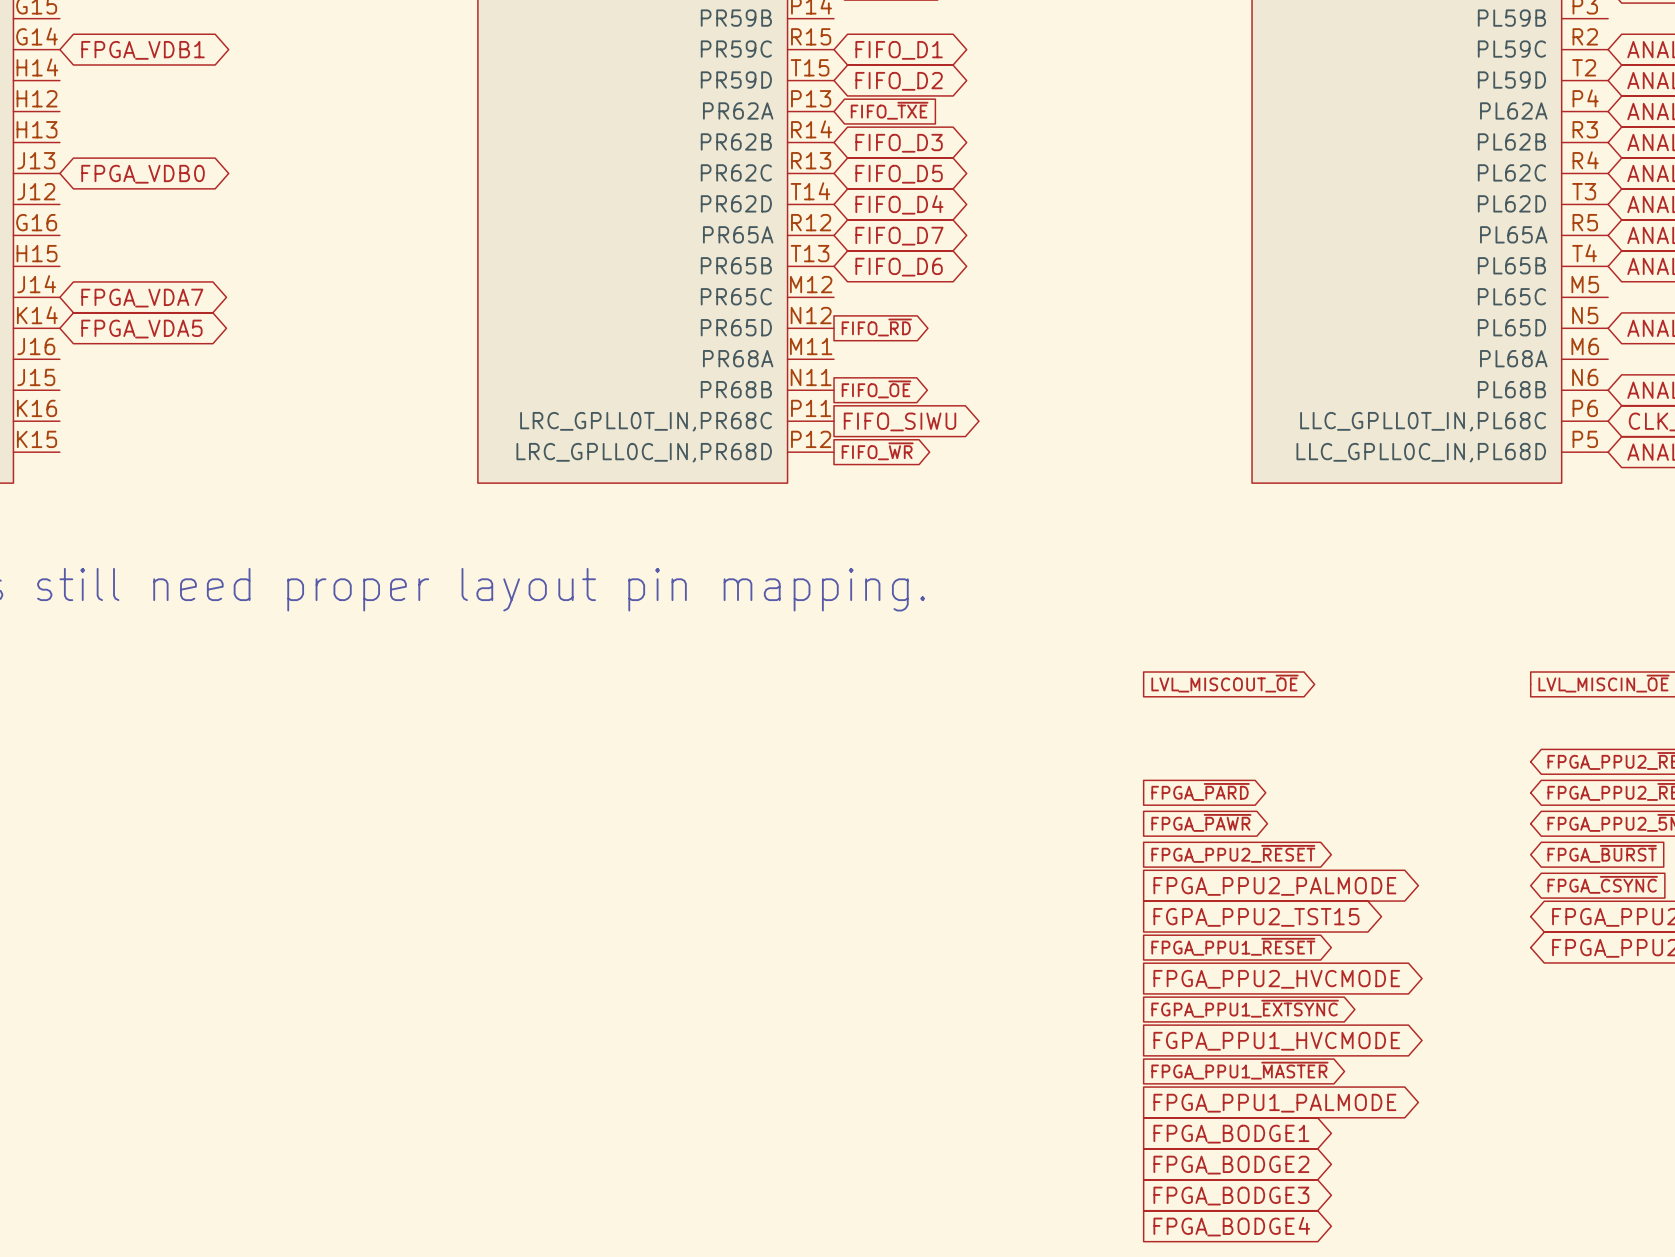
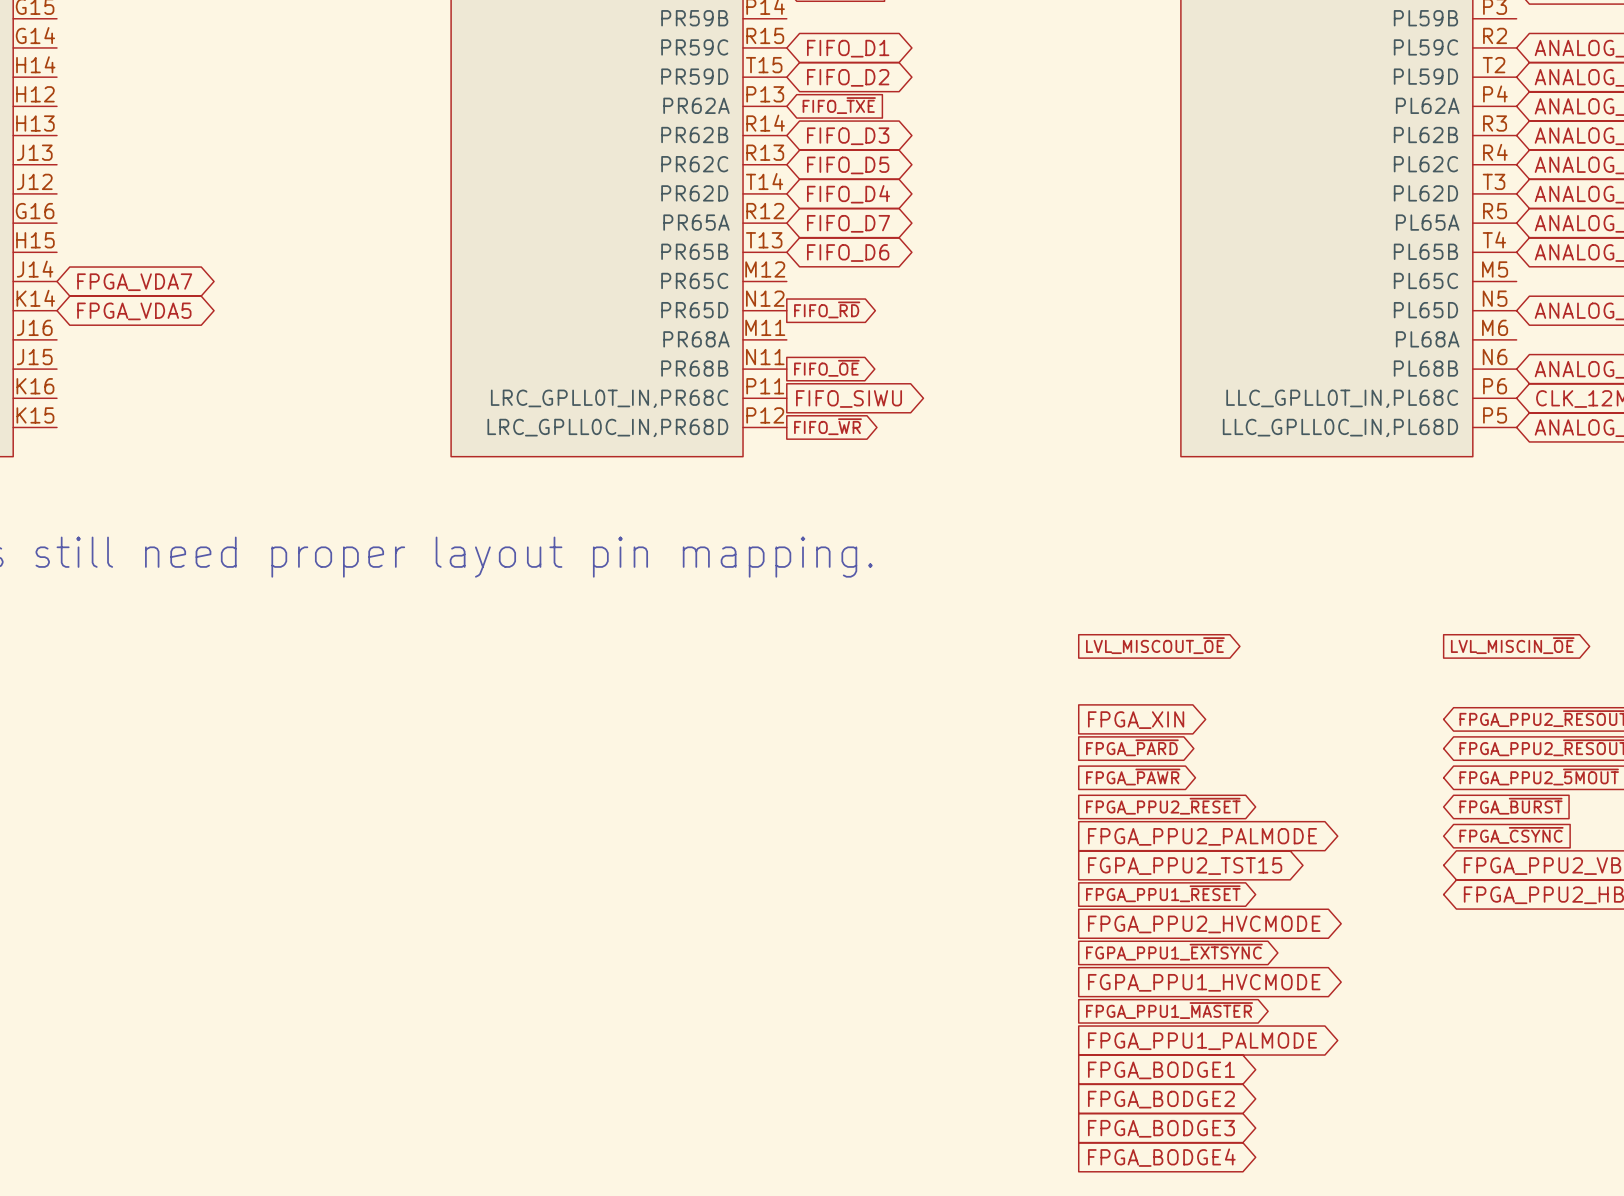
global label: FPGA_VDB1 (143, 50) -> none
global label: FPGA_VDB0 (143, 174) -> none
global label: none -> FPGA_XIN (1136, 720)

